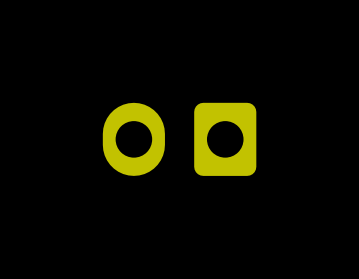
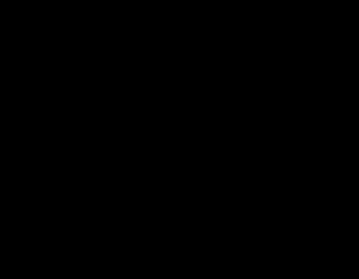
part: (179, 139) -> none

